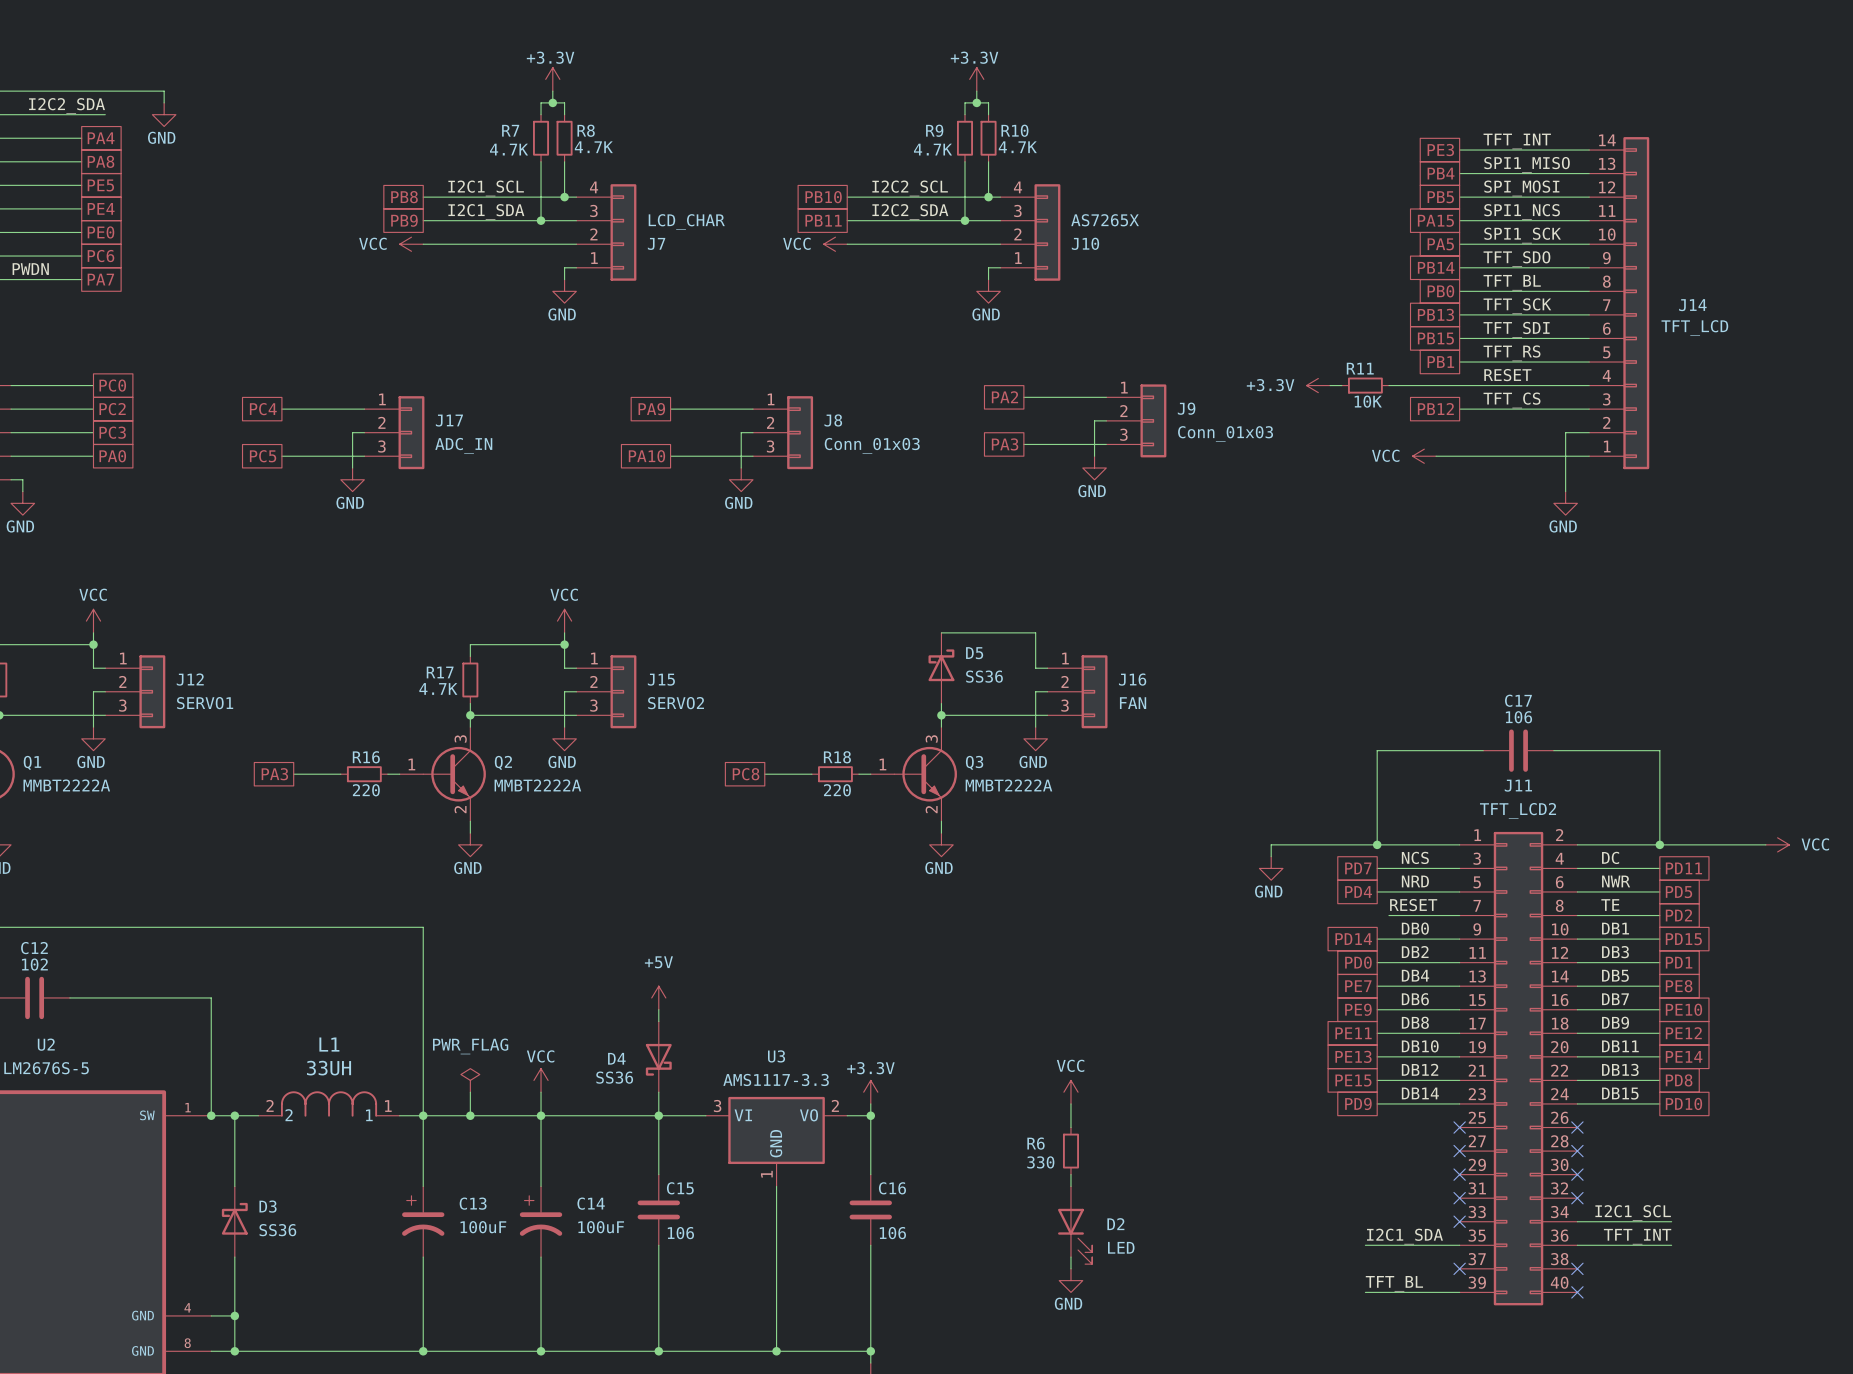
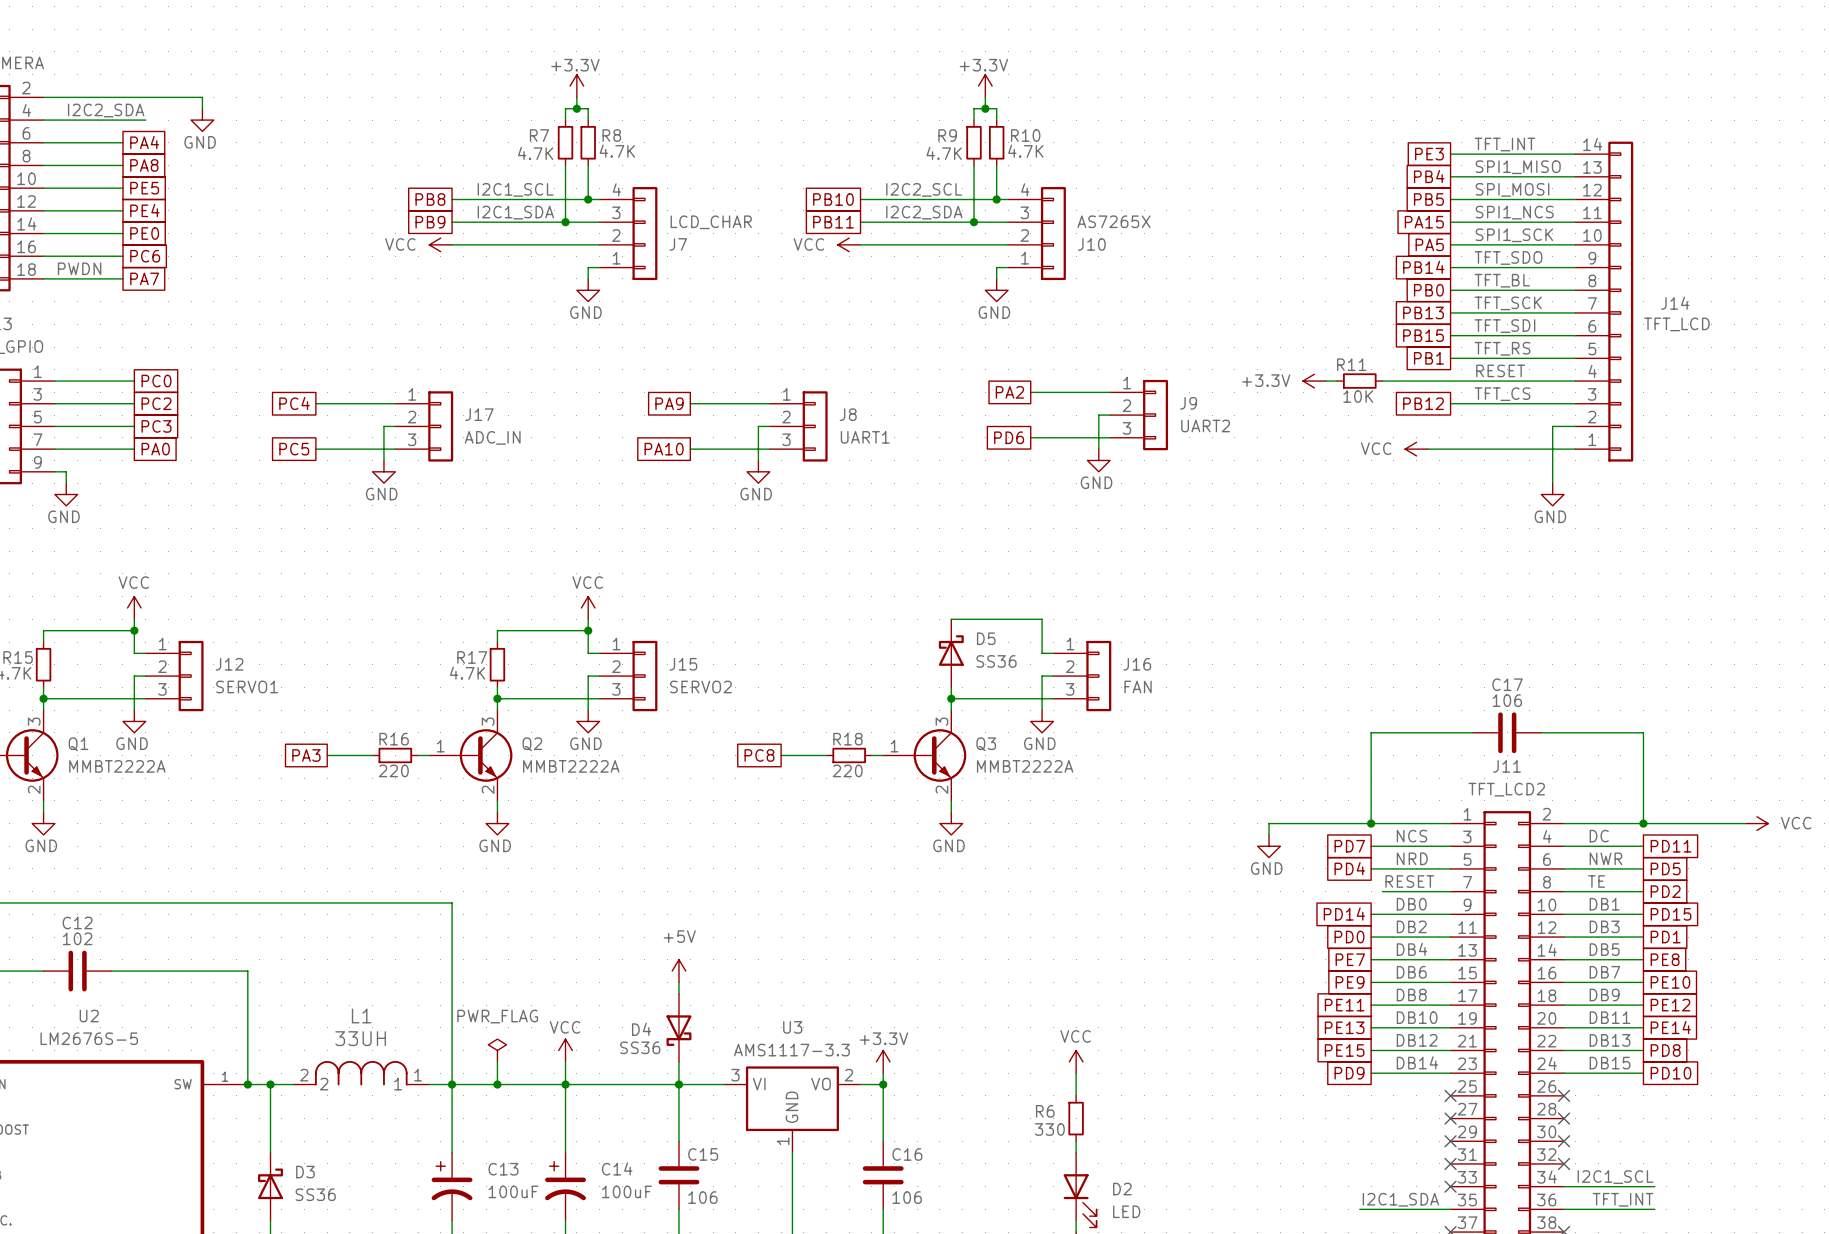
J9 value: Conn_01x03 (1225, 434) -> UART2 (1205, 426)
global label: PA3 (1005, 444) -> PD6 (1009, 437)
J8 value: Conn_01x03 (872, 445) -> UART1 (865, 437)

